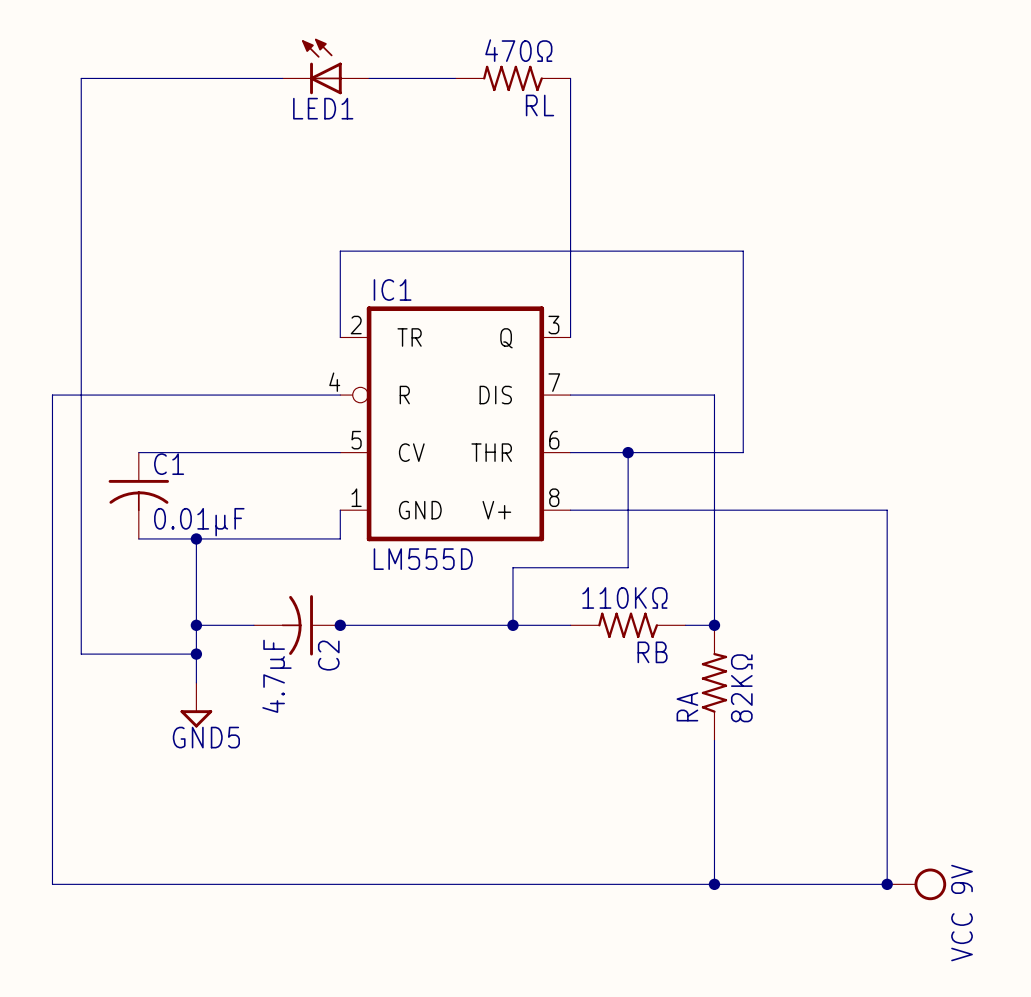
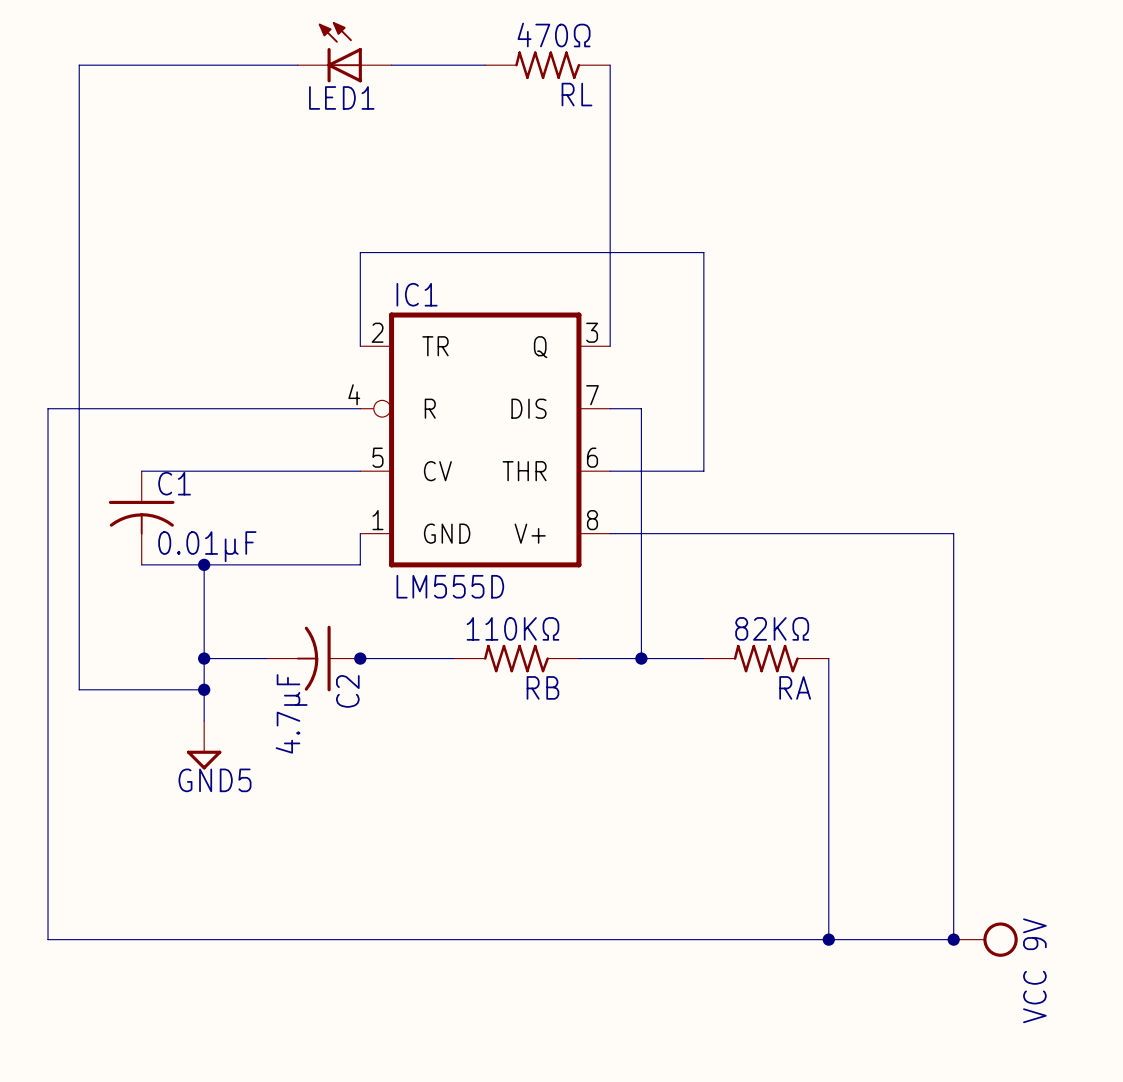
wire: (656, 251) (743, 251) (743, 452) (656, 452) -> (703, 252) (703, 471)
wire: (599, 395) (714, 395) (714, 625) (685, 625) -> (641, 408) (641, 658)
wire: (628, 452) (628, 567) (513, 567) (513, 625) -> none
junction: (628, 452) -> none
junction: (513, 625) -> none
junction: none -> (641, 658)
RB position: (628, 625) -> (516, 658)
junction: (714, 625) -> none
wire: none -> (828, 658) (828, 939)
RA rotation: 0° (714, 682) -> 90° counterclockwise (766, 658)
wire: (714, 740) (714, 884) -> none
junction position: (714, 884) -> (828, 939)

